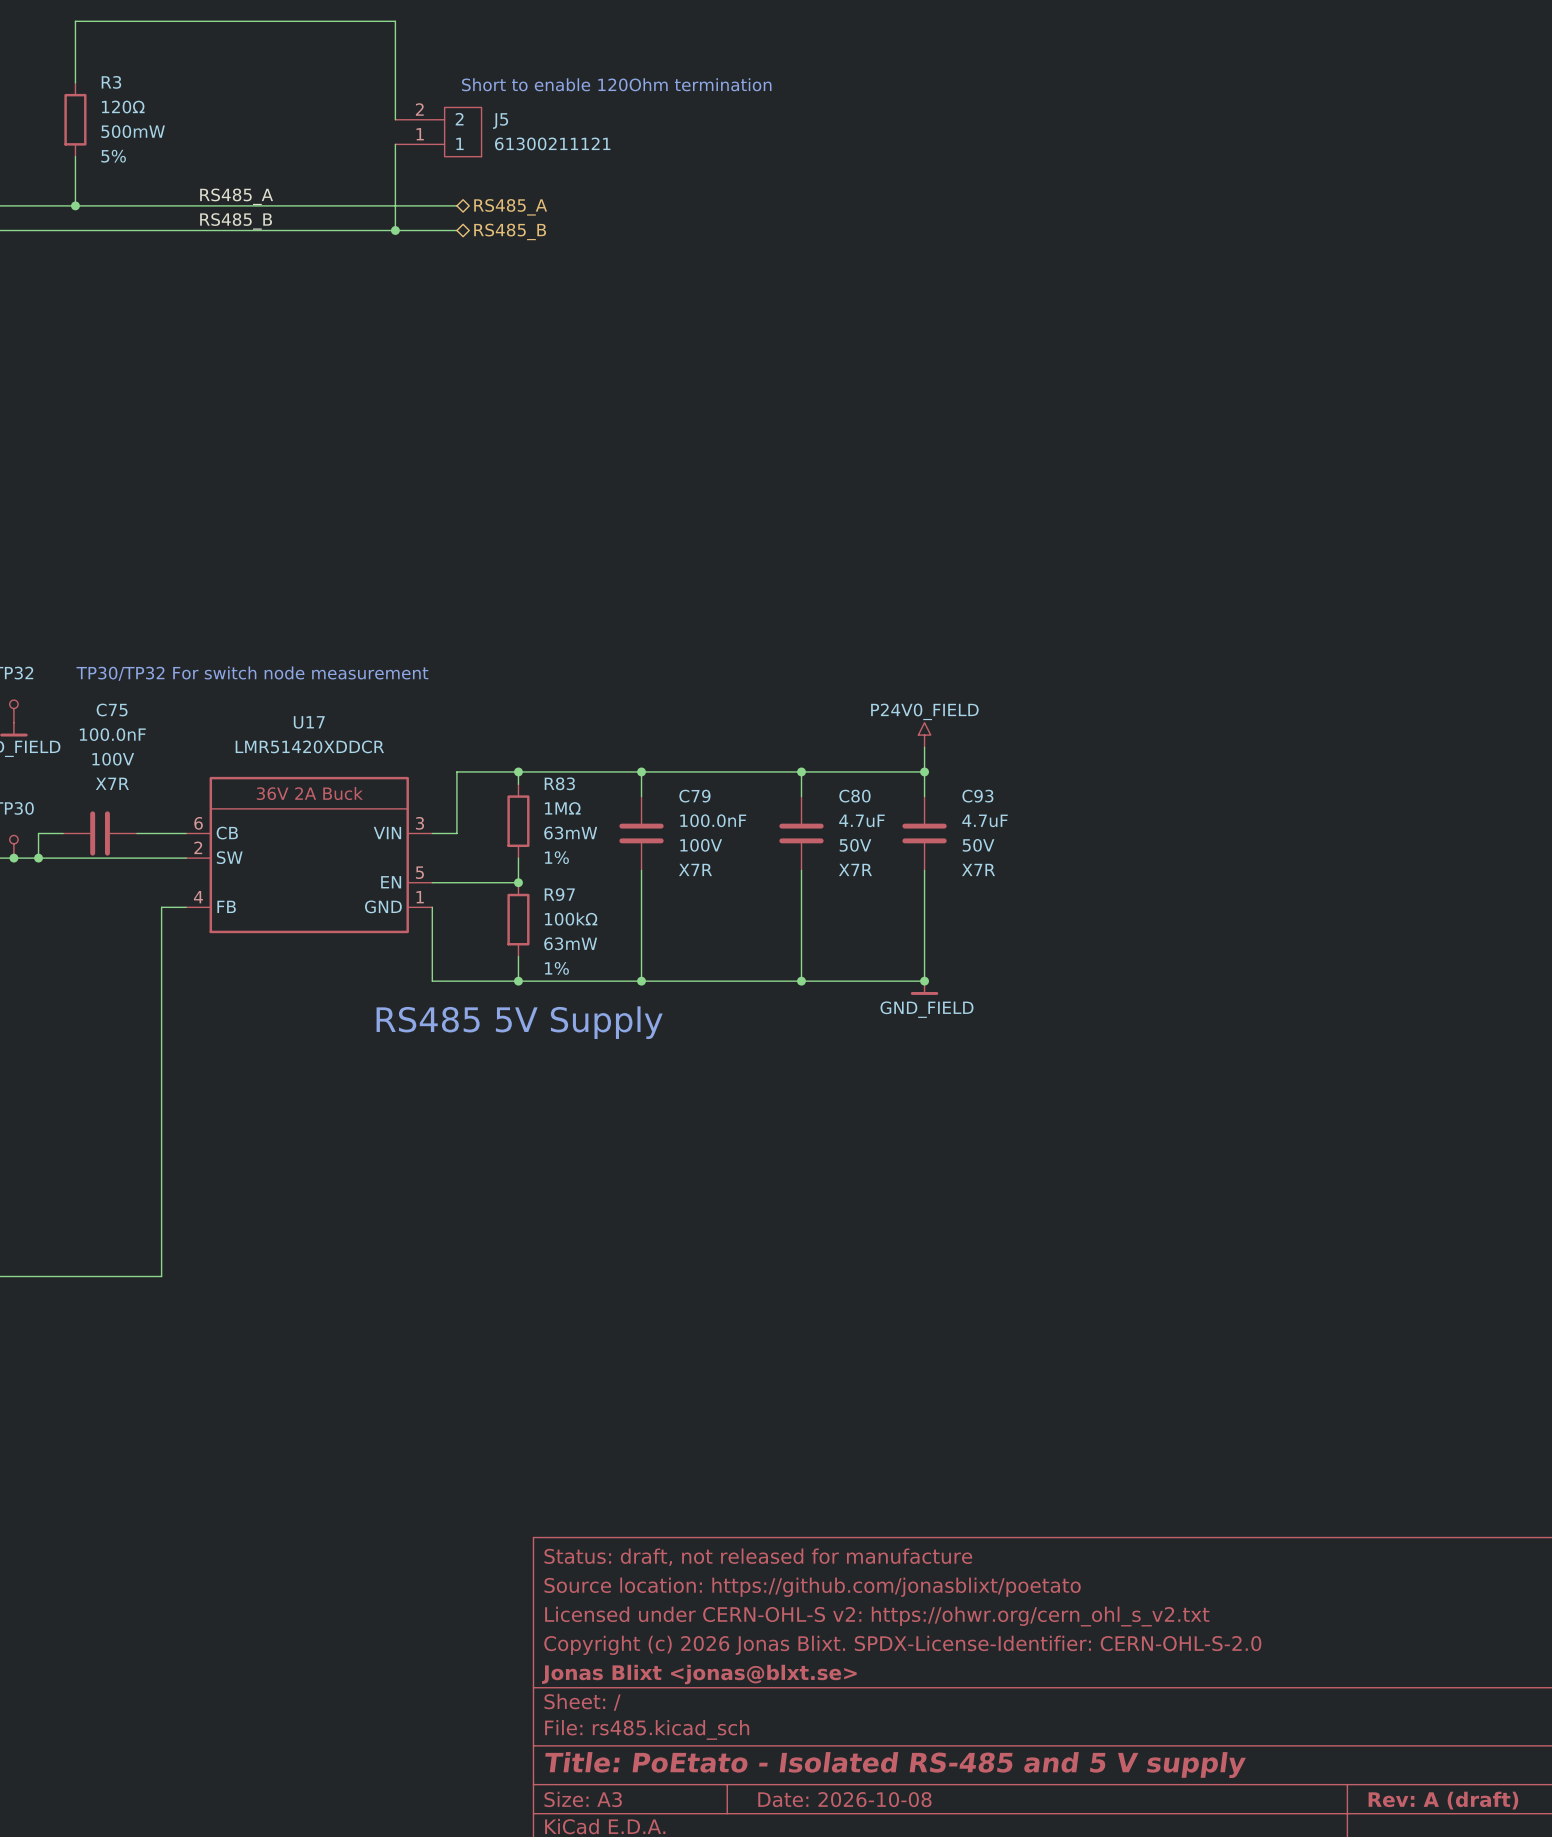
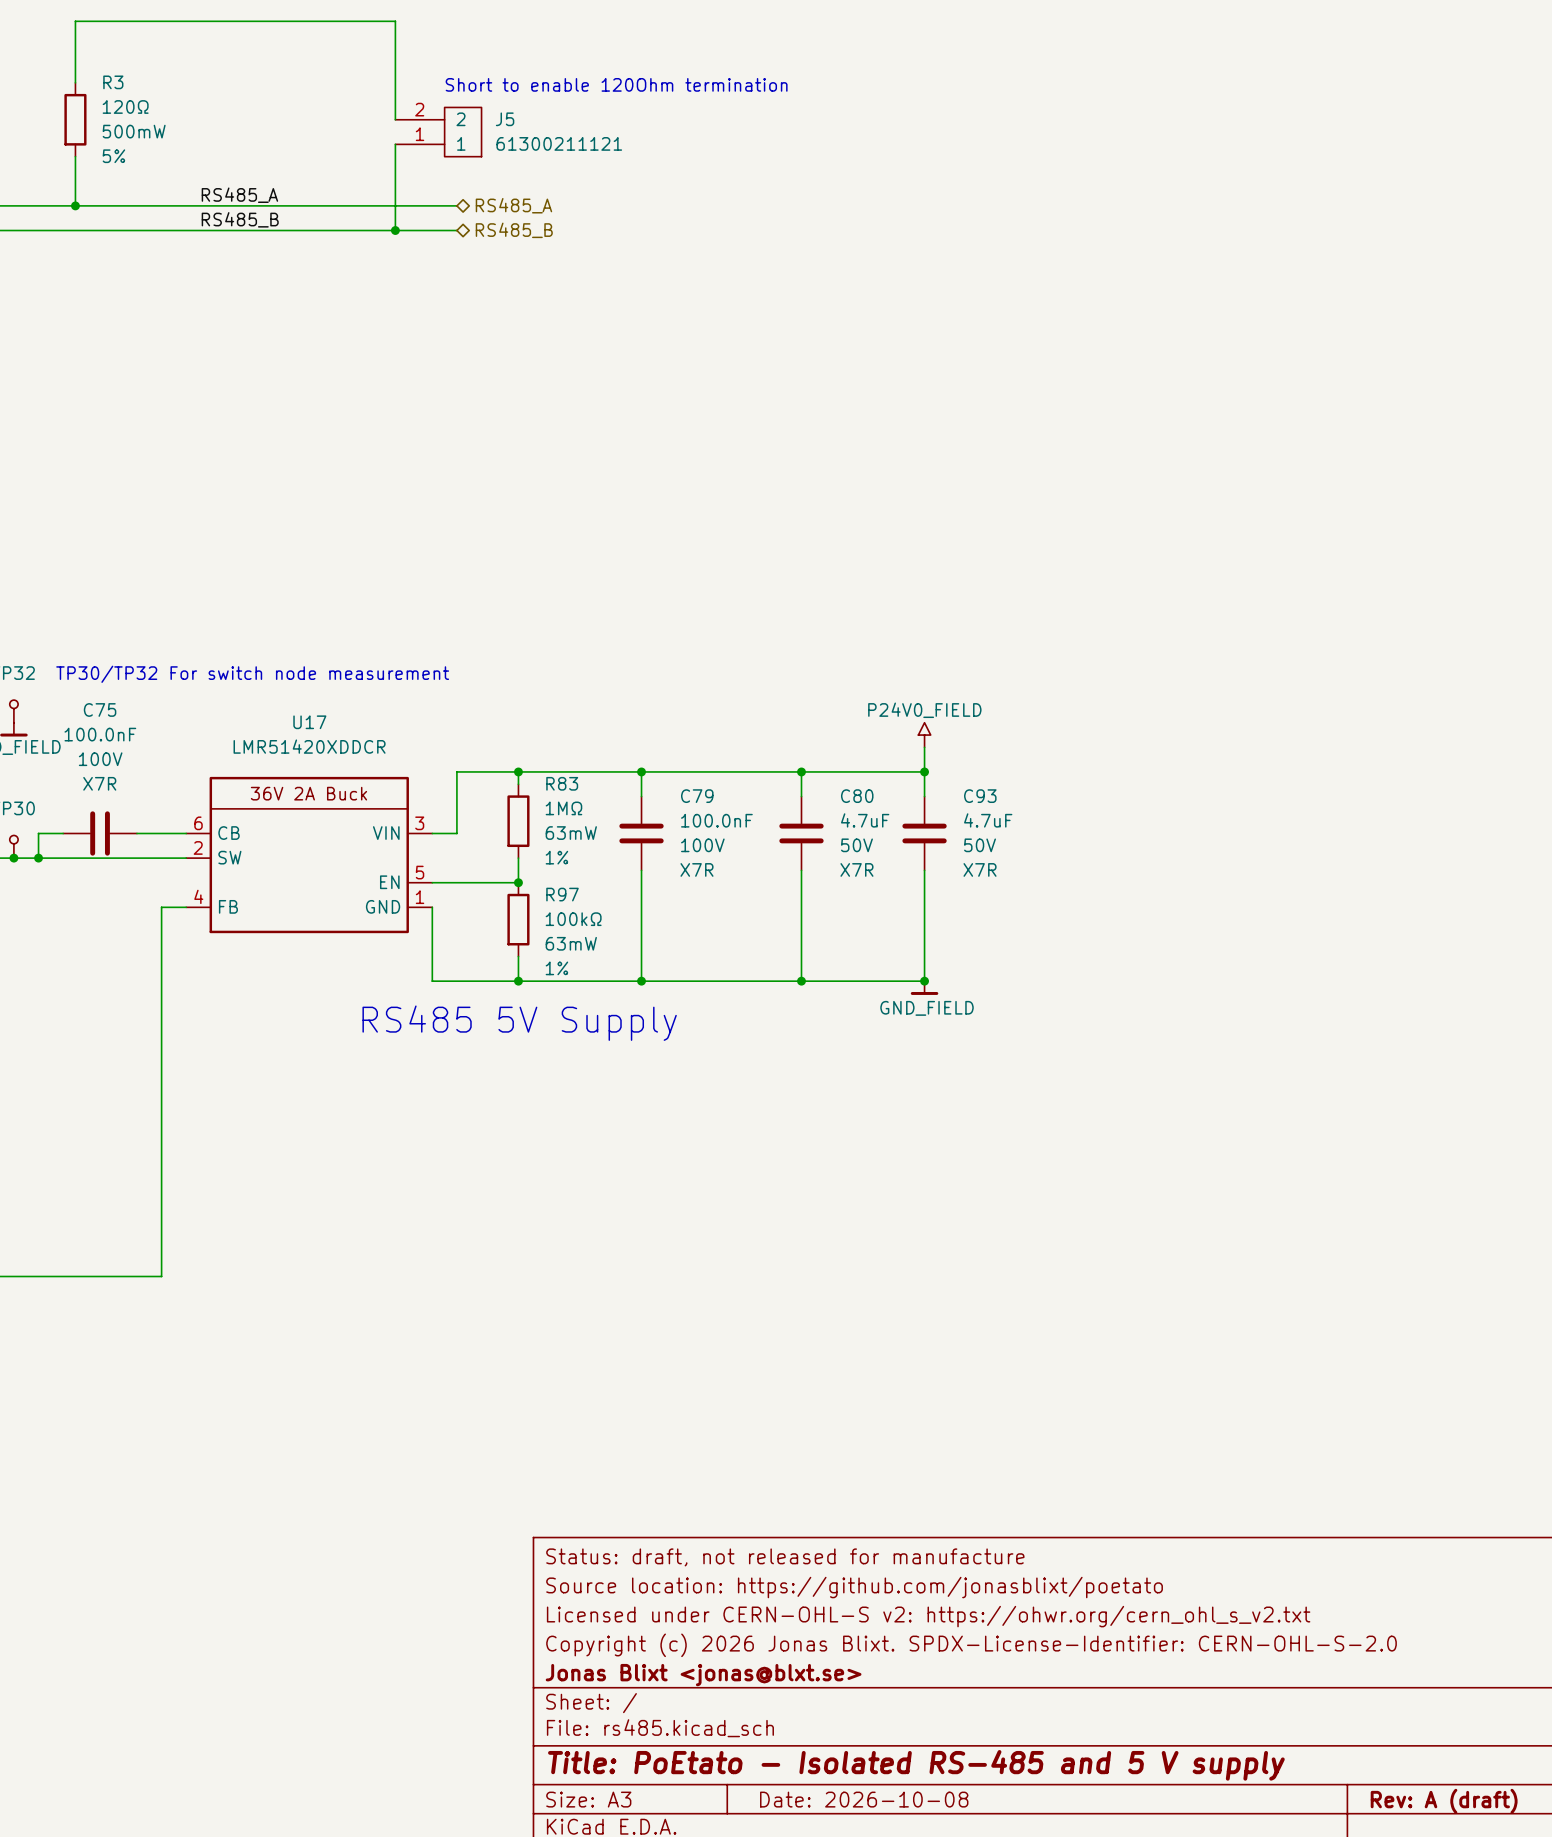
C75 name position: C75 (112, 709) -> C75 (100, 709)
C75 value position: 100.0nF (112, 734) -> 100.0nF (100, 734)
C75 text position: 100V (113, 759) -> 100V (100, 759)
C75 text position: X7R (112, 783) -> X7R (99, 783)

